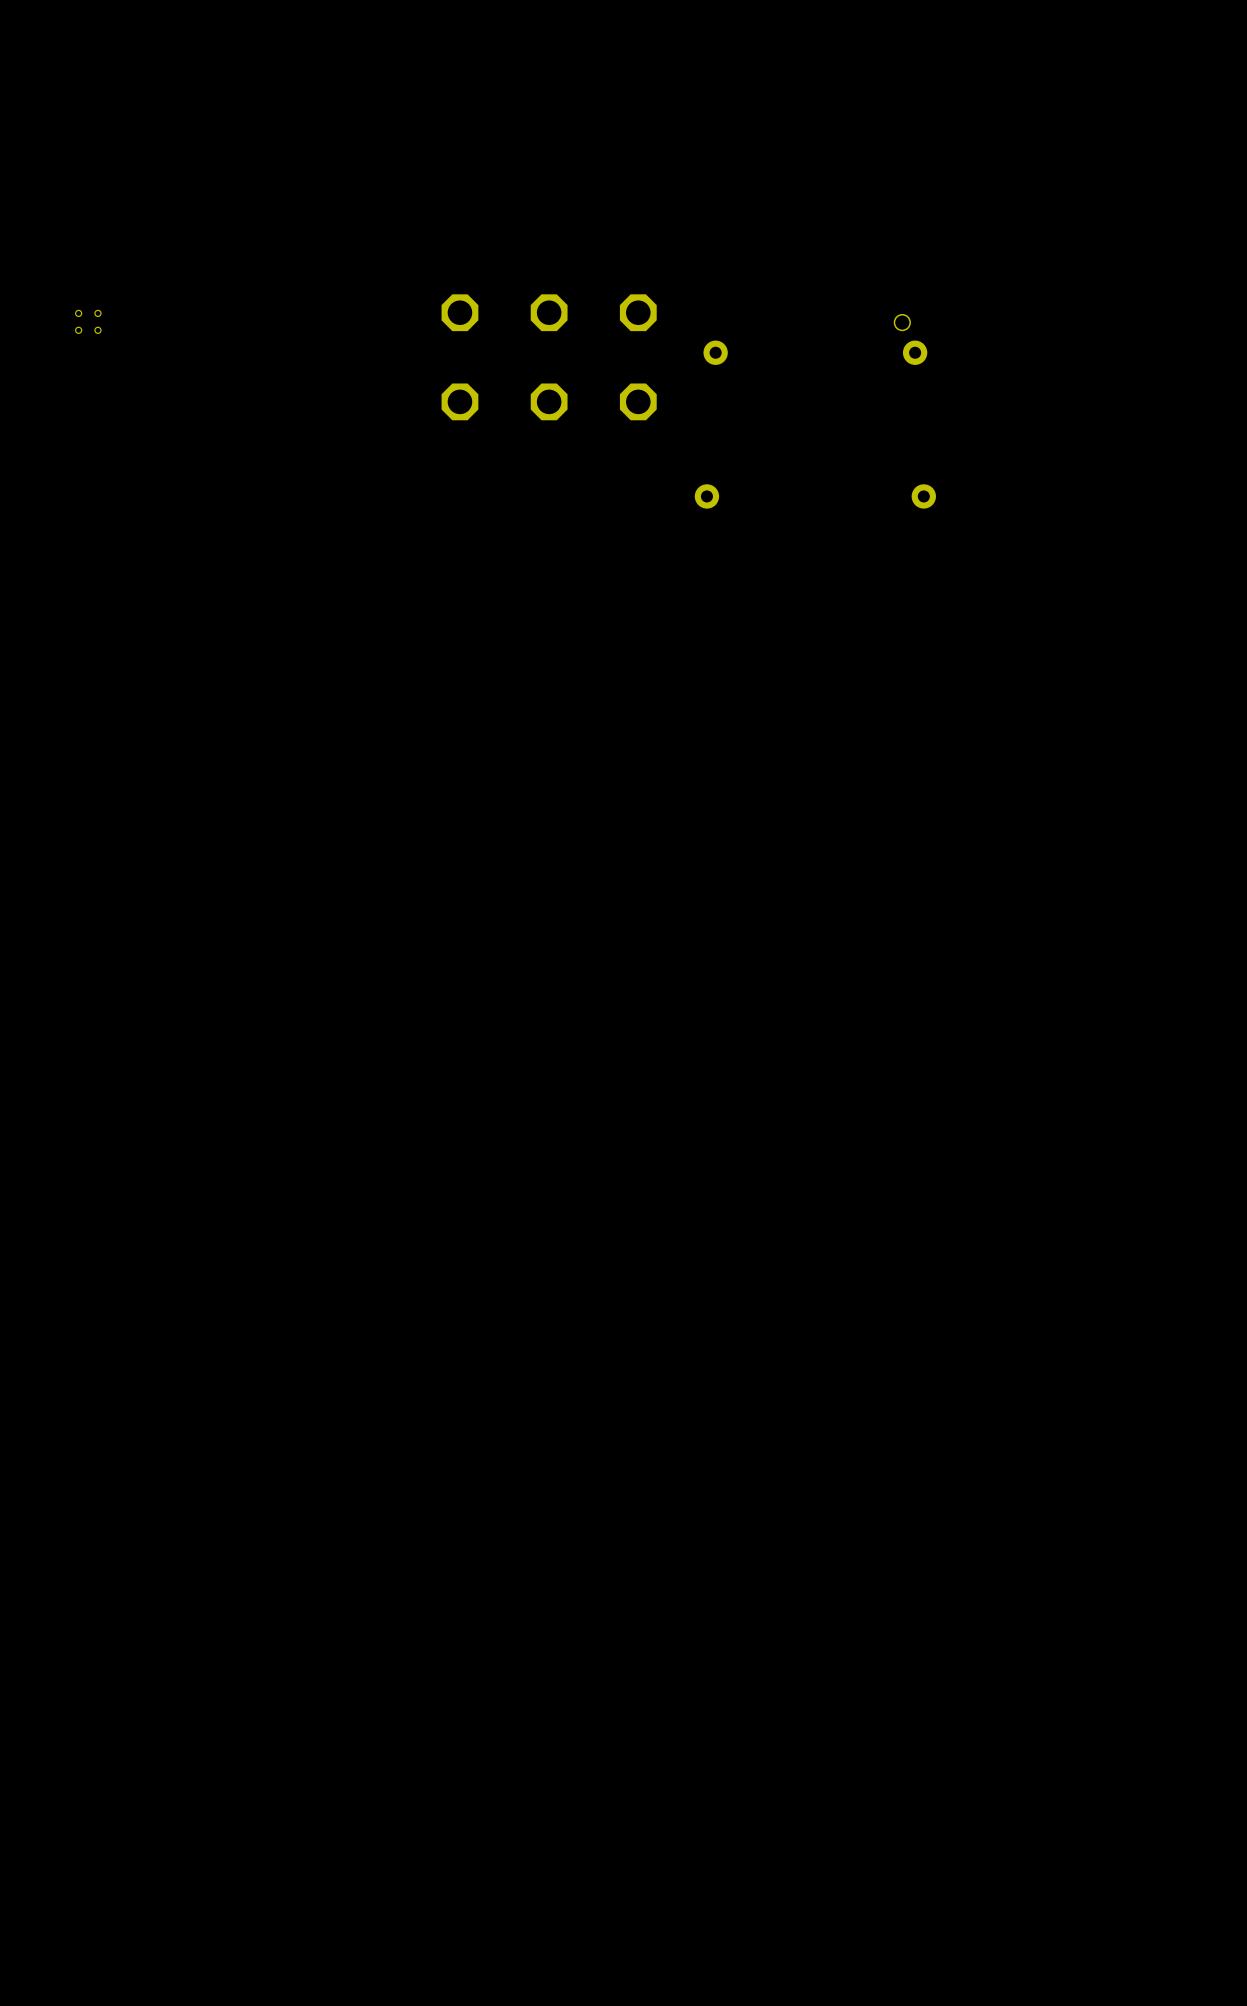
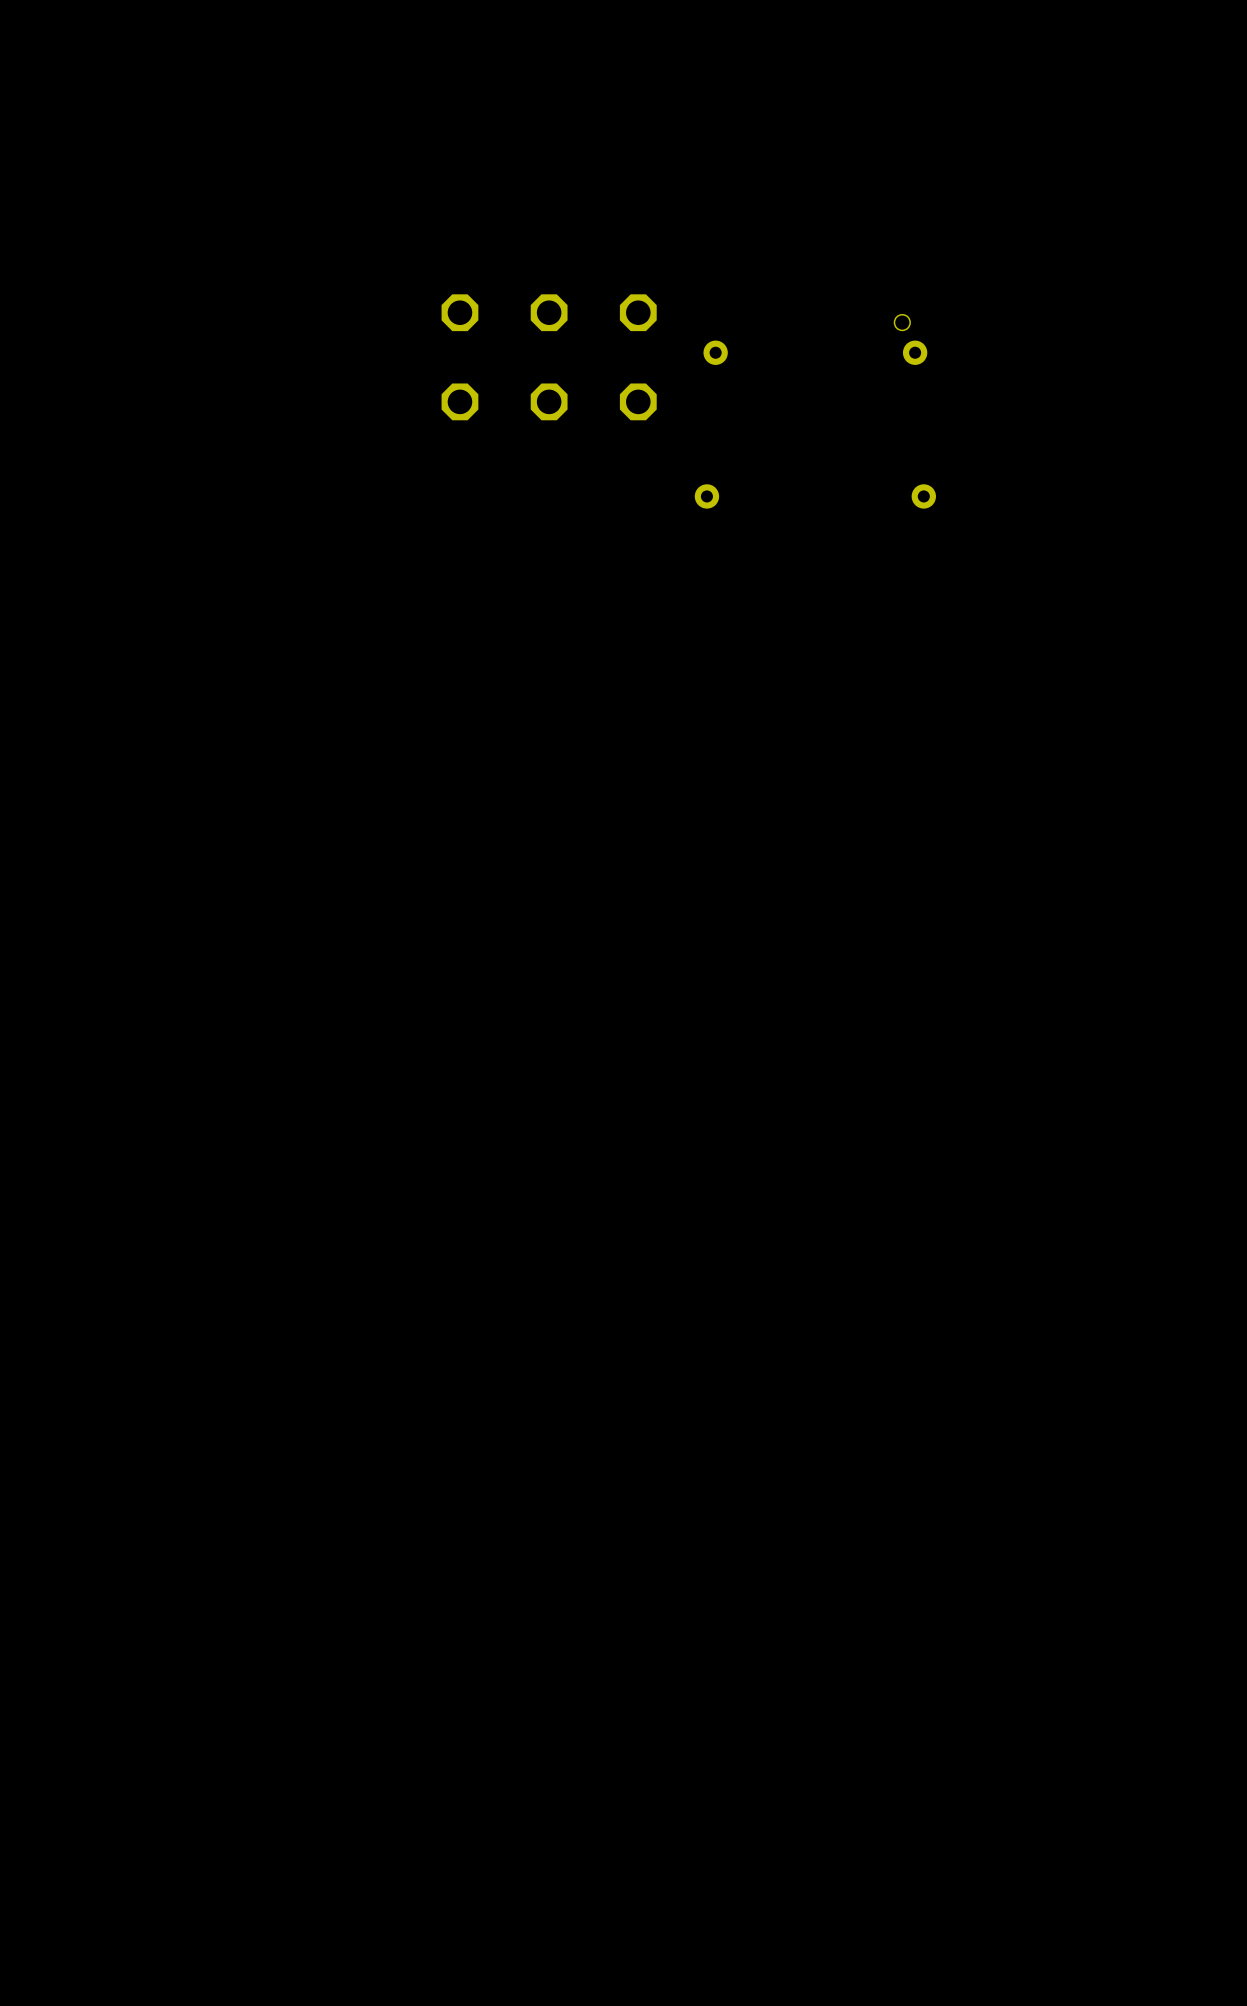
part: (88, 321) -> none

